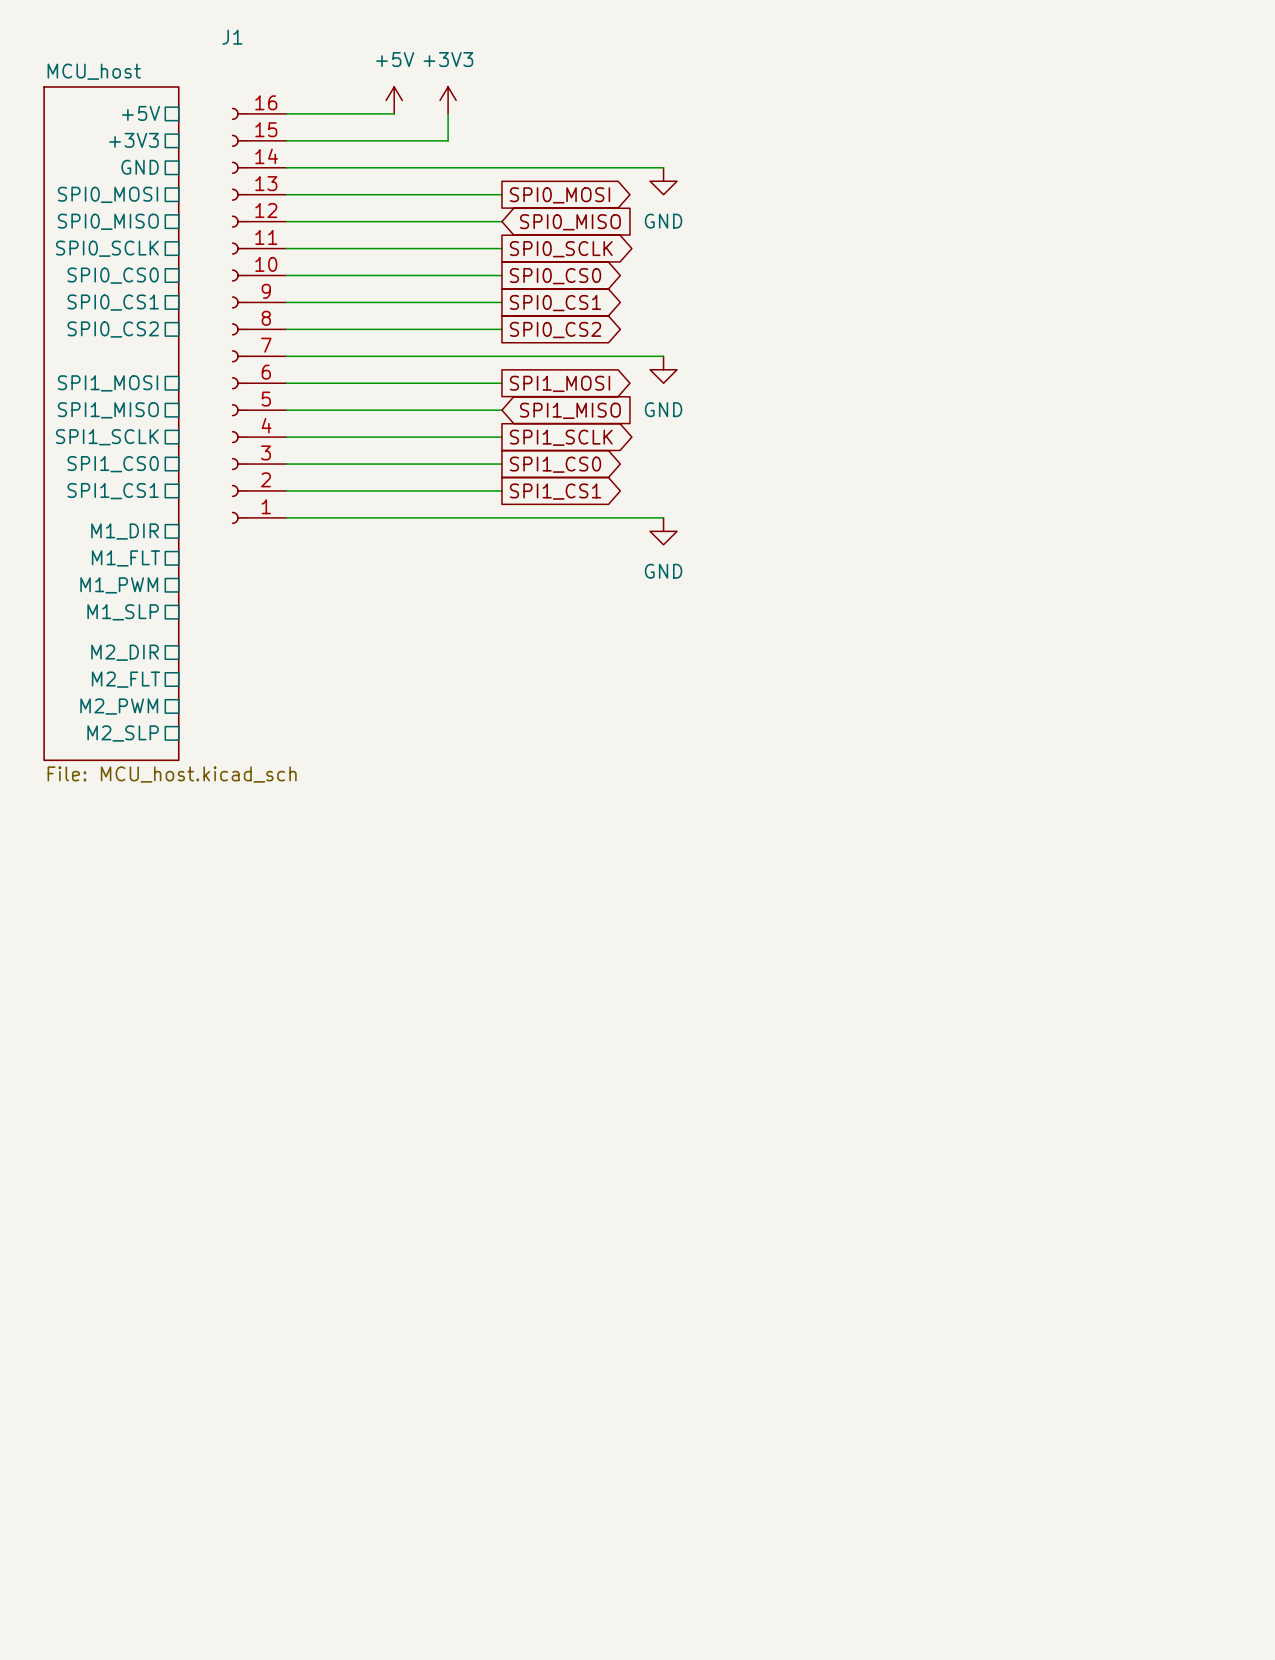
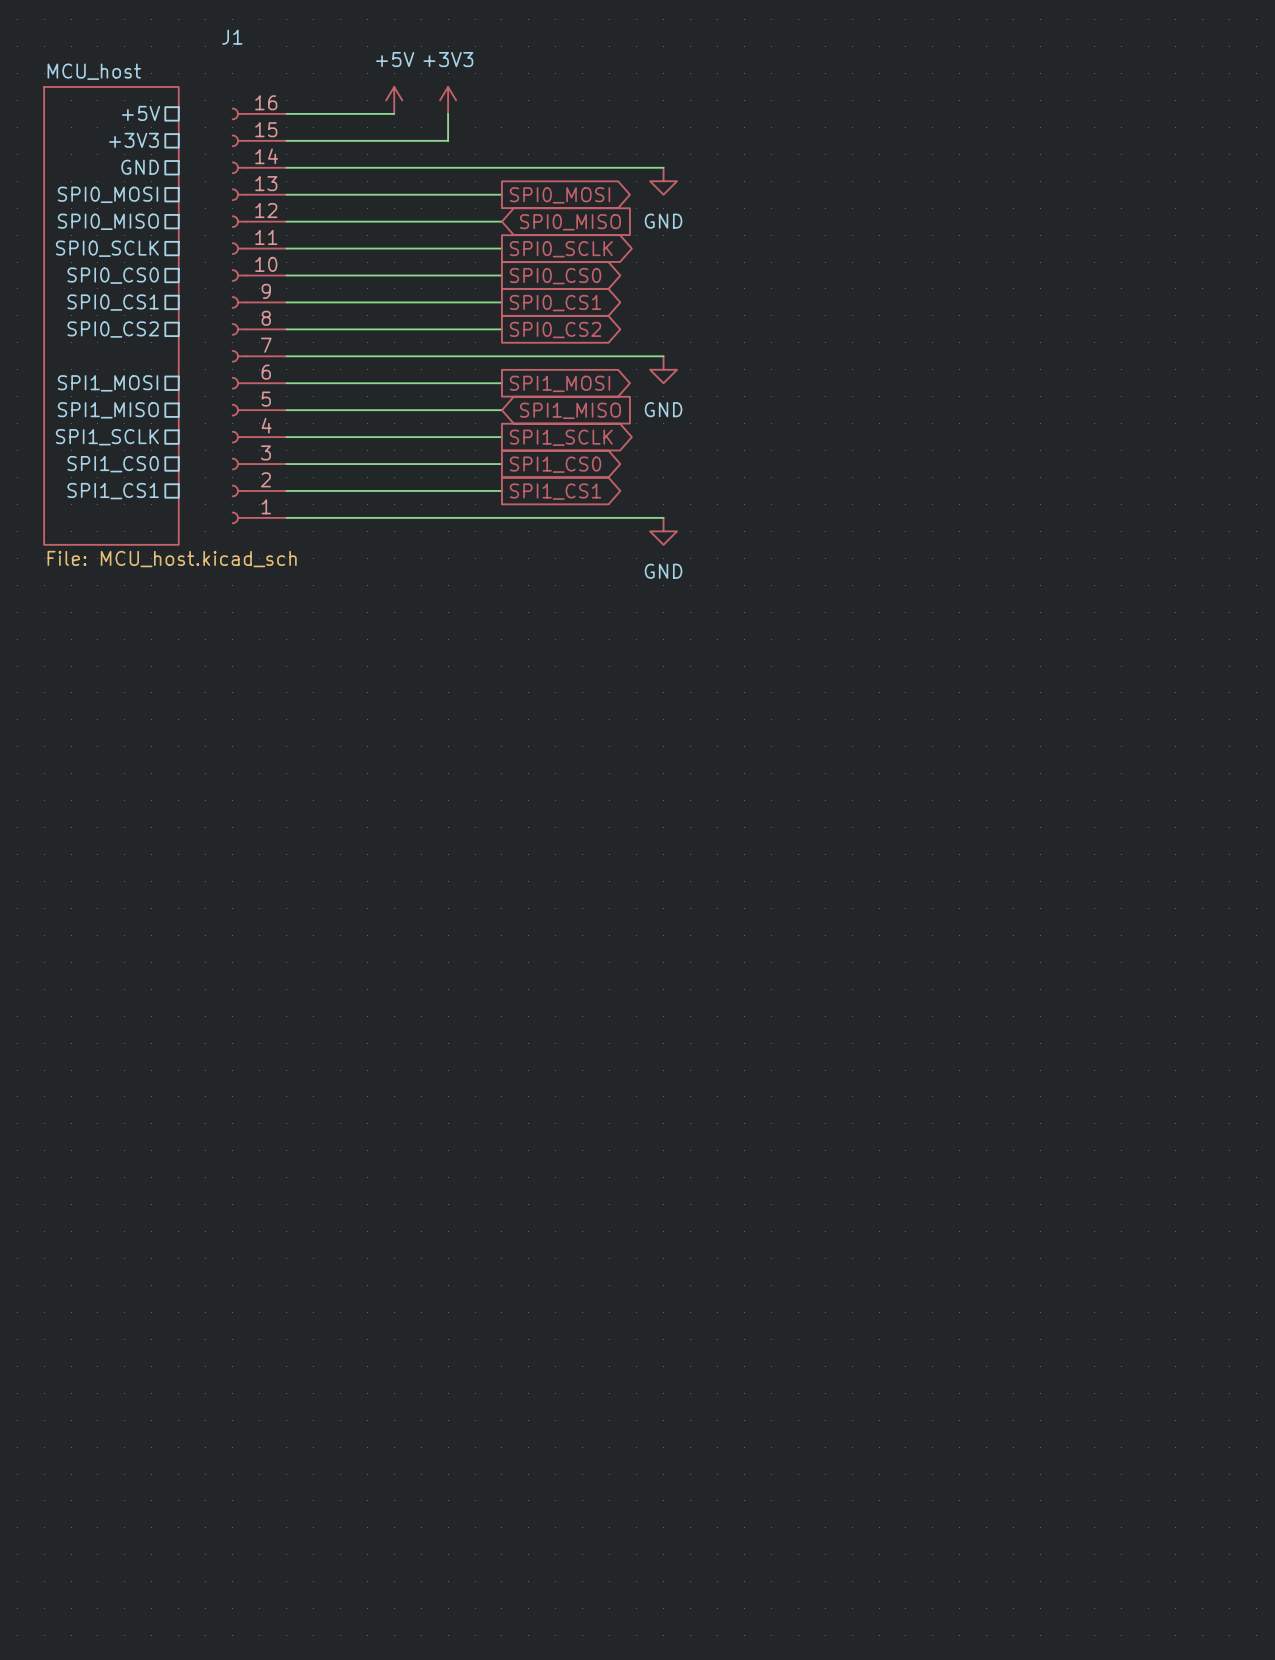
sheet MCU_host: none -> File: MCU_host.kicad_sch (111, 315)
sheet MCU_host: File: MCU_host.kicad_sch (111, 423) -> none
sheet pin: M1_DIR (125, 531) -> none
sheet pin: M1_FLT (125, 558) -> none
sheet pin: M1_PWM (119, 585) -> none
sheet pin: M1_SLP (123, 612) -> none
sheet pin: M2_DIR (125, 652) -> none
sheet pin: M2_FLT (125, 679) -> none
sheet pin: M2_PWM (119, 706) -> none
sheet pin: M2_SLP (123, 733) -> none

